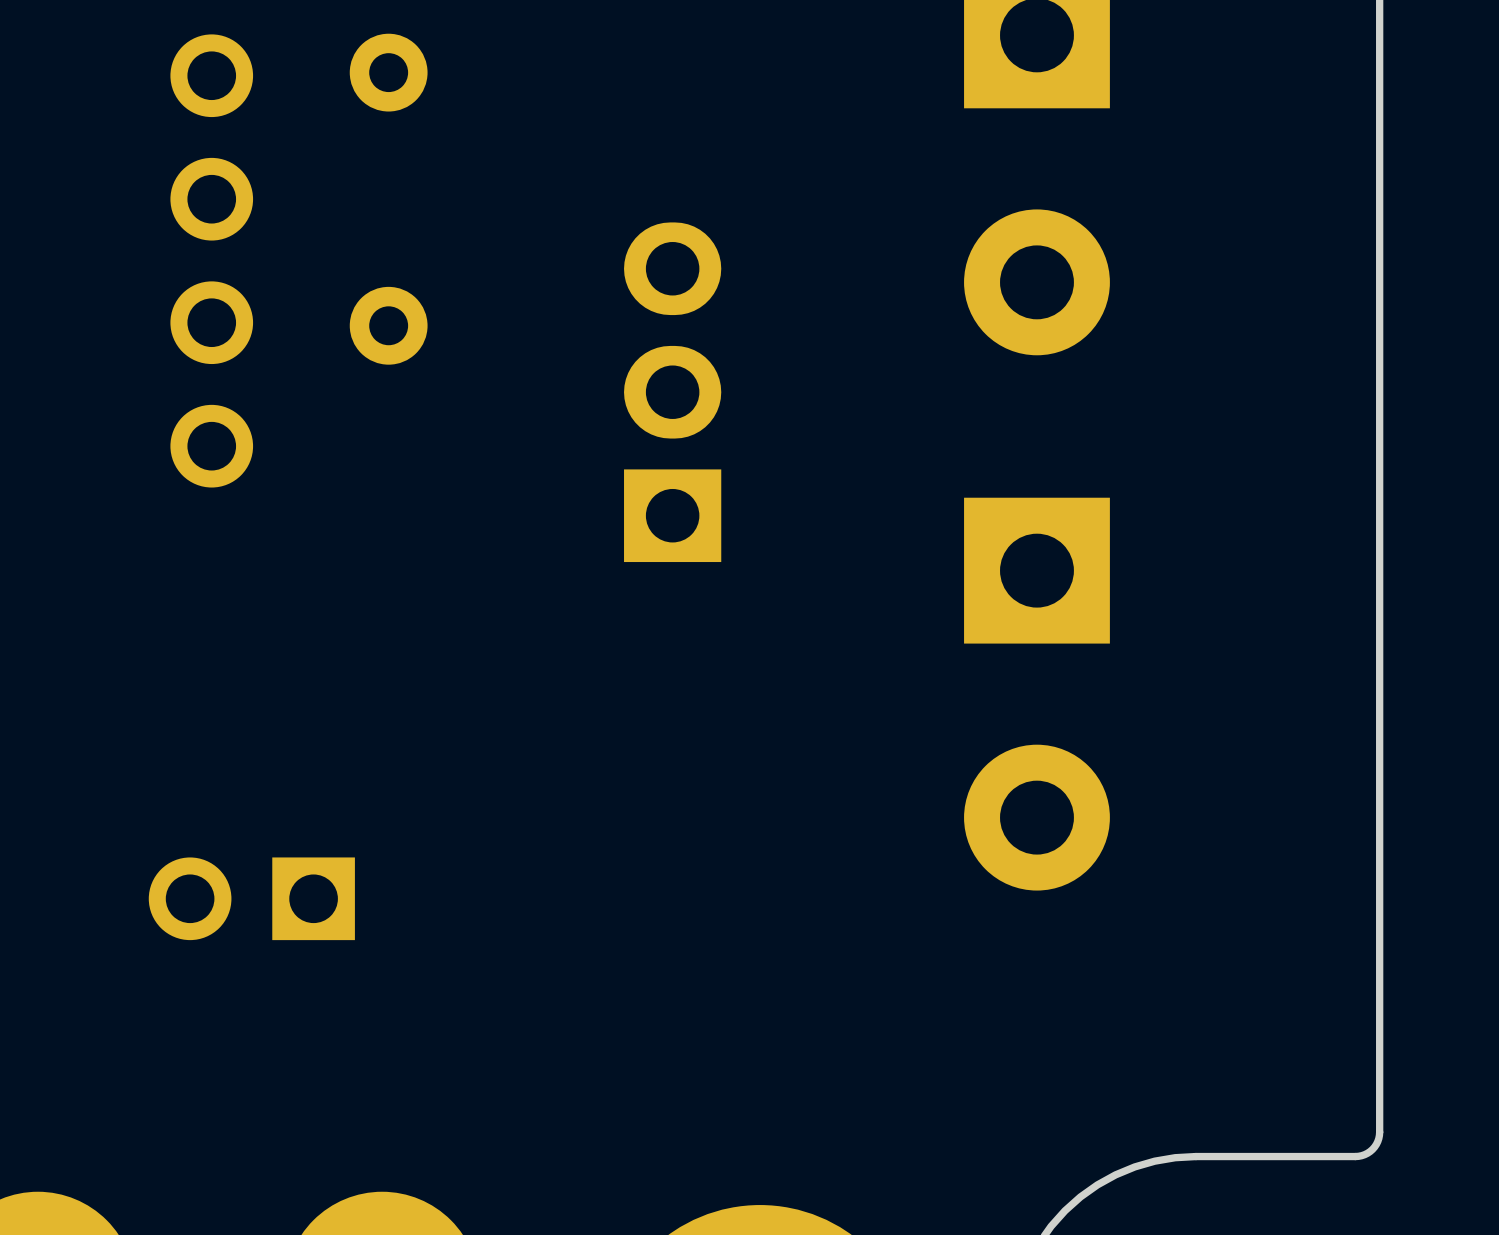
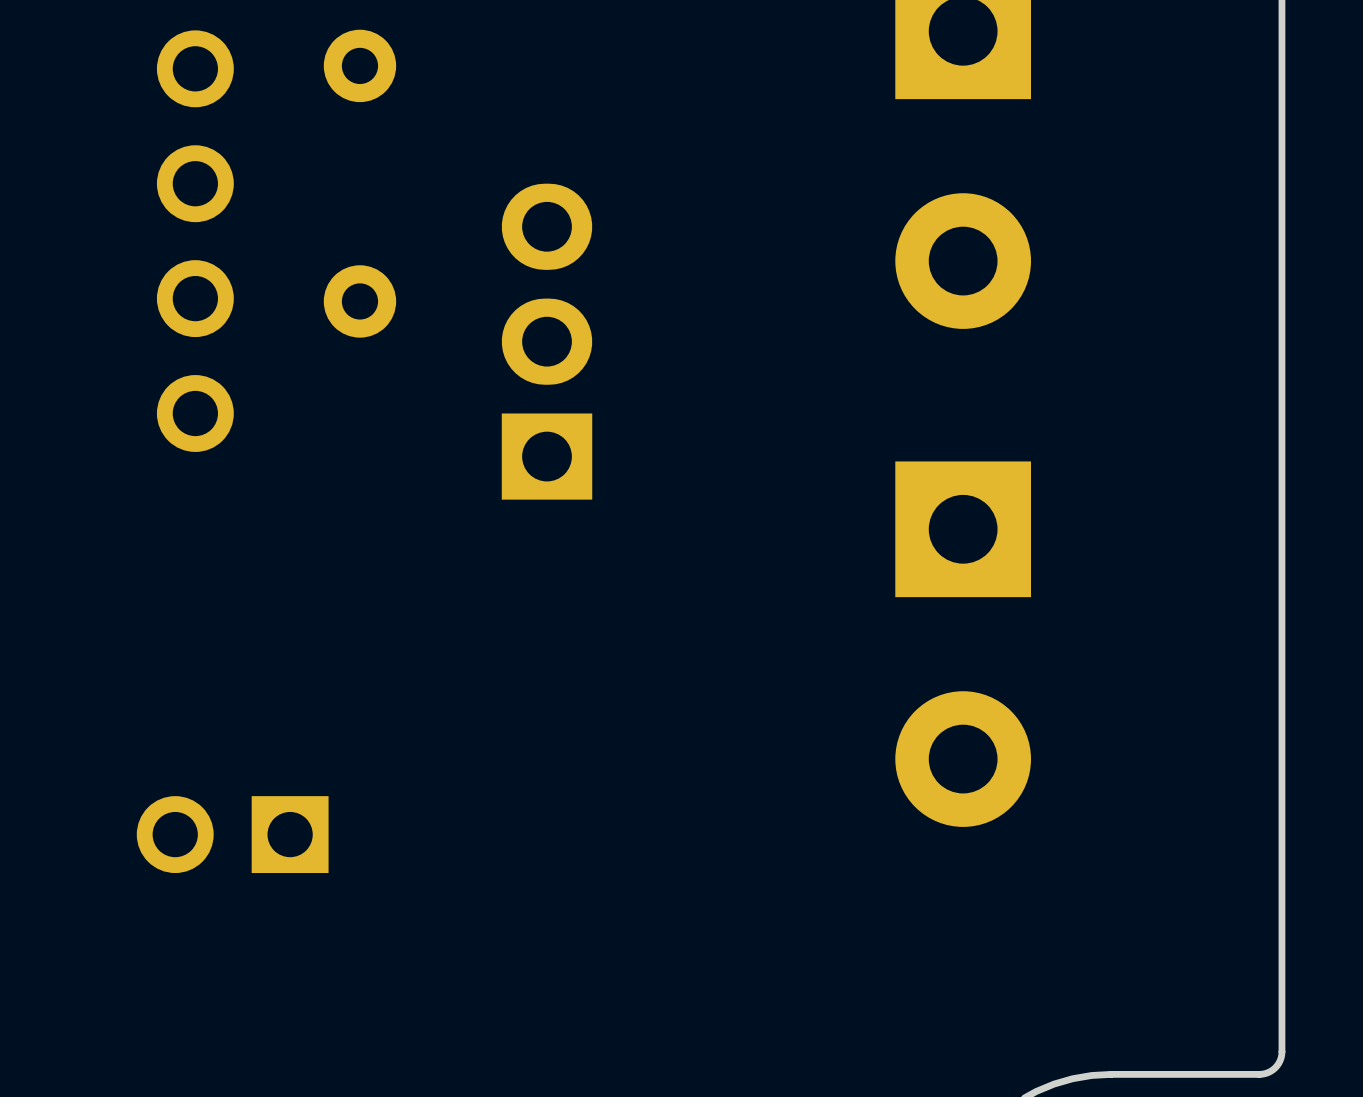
part position: (672, 392) -> (547, 341)

